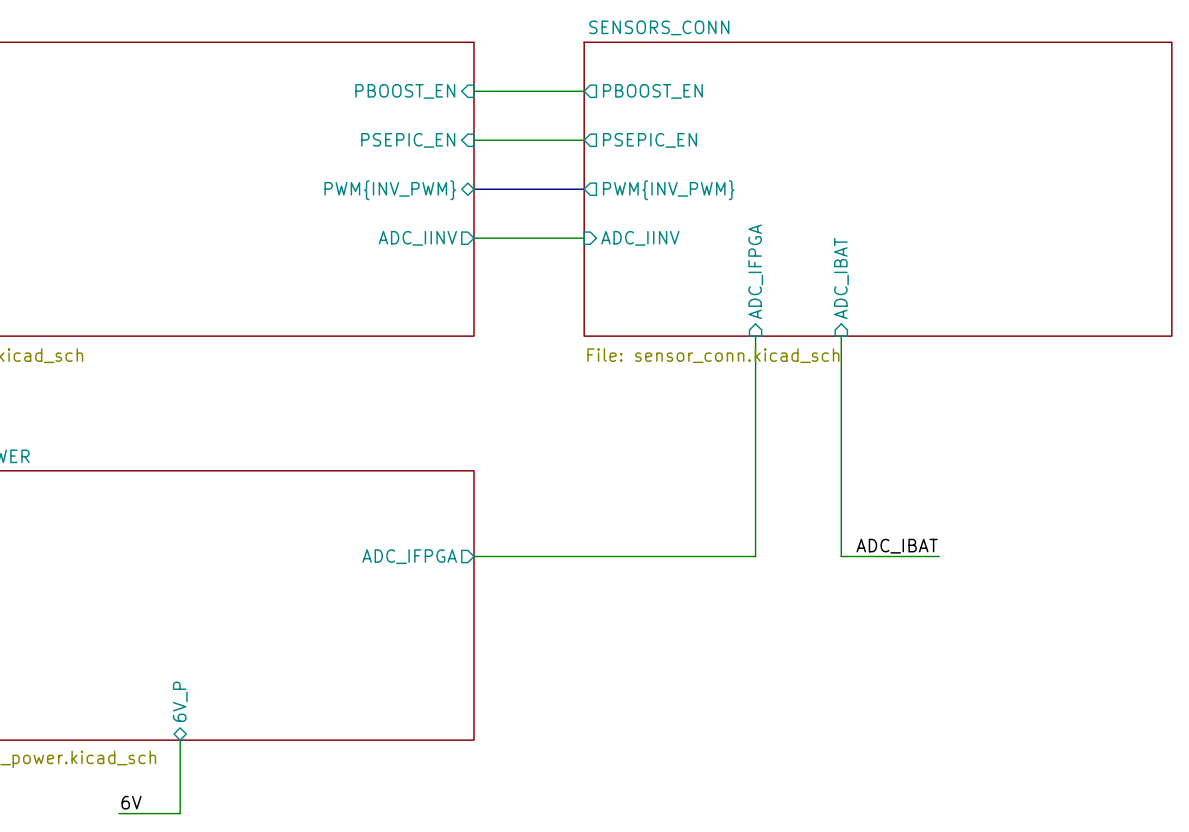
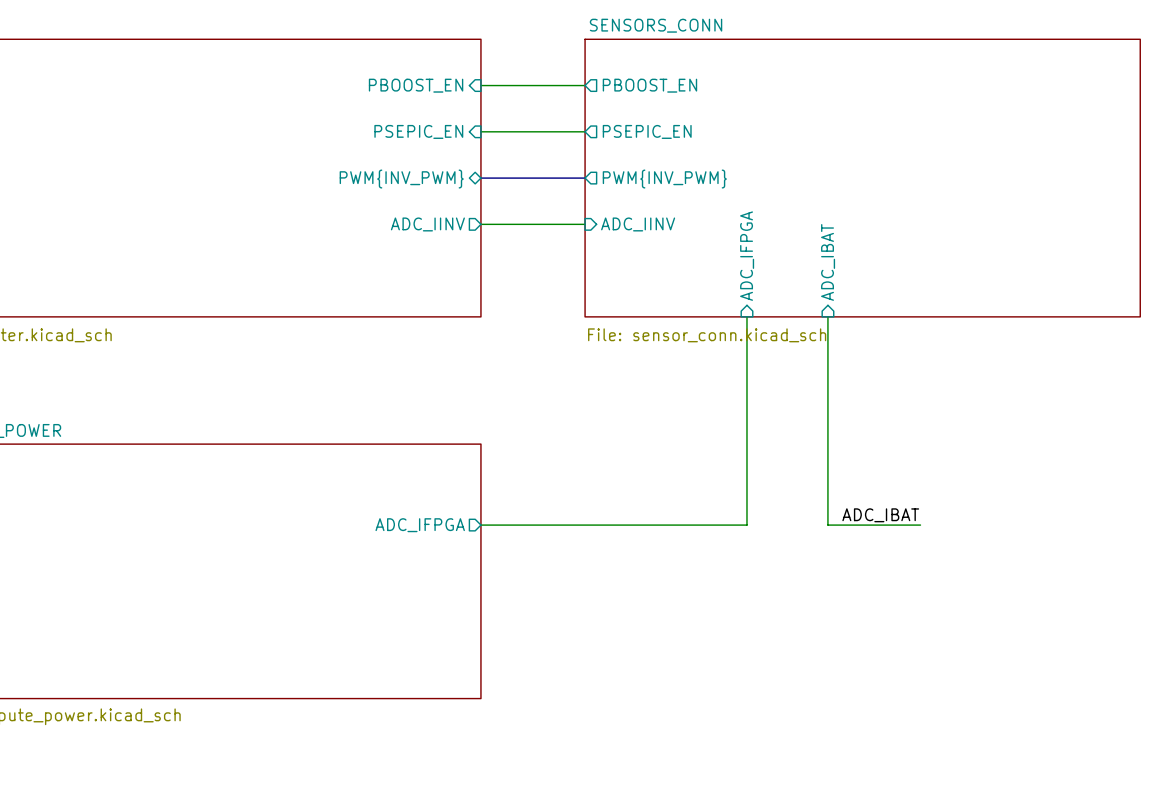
sheet pin: 6V_P (180, 701) -> none
wire: (180, 740) (180, 813) (118, 813) -> none
label: 6V (131, 802) -> none

